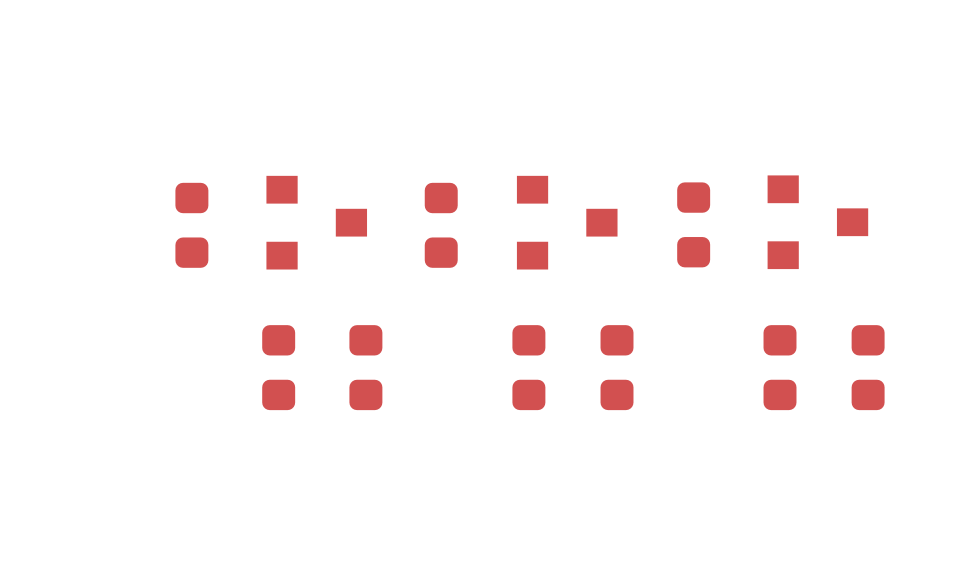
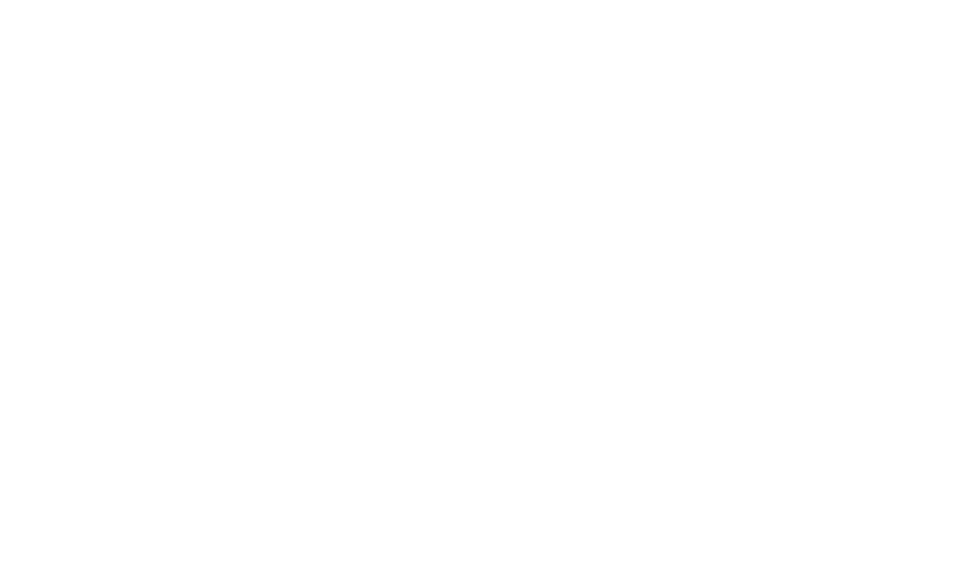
part: (316, 222) -> none
part: (567, 222) -> none
part: (817, 222) -> none
part: (693, 224) -> none
part: (191, 225) -> none
part: (441, 225) -> none
part: (278, 367) -> none
part: (365, 367) -> none
part: (528, 367) -> none
part: (617, 367) -> none
part: (780, 367) -> none
part: (868, 367) -> none

